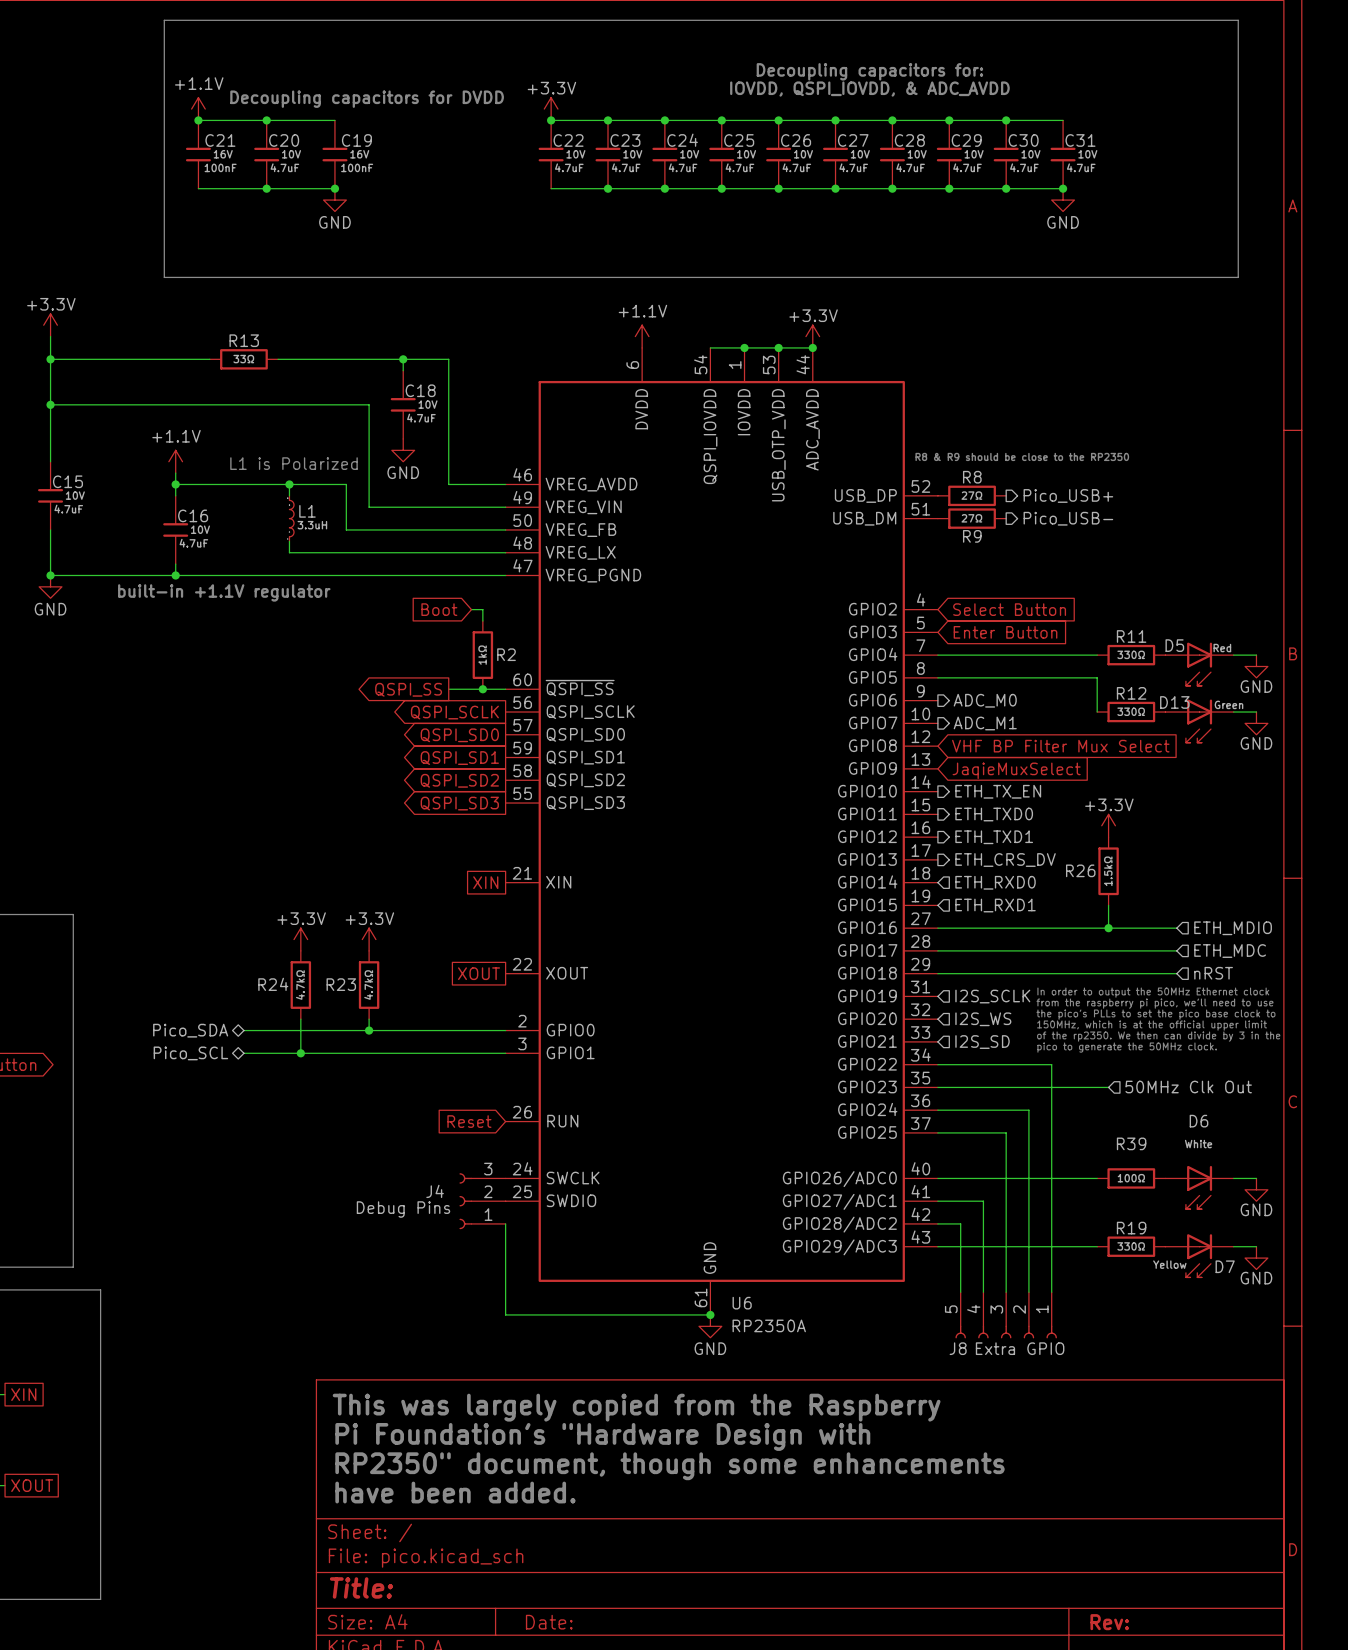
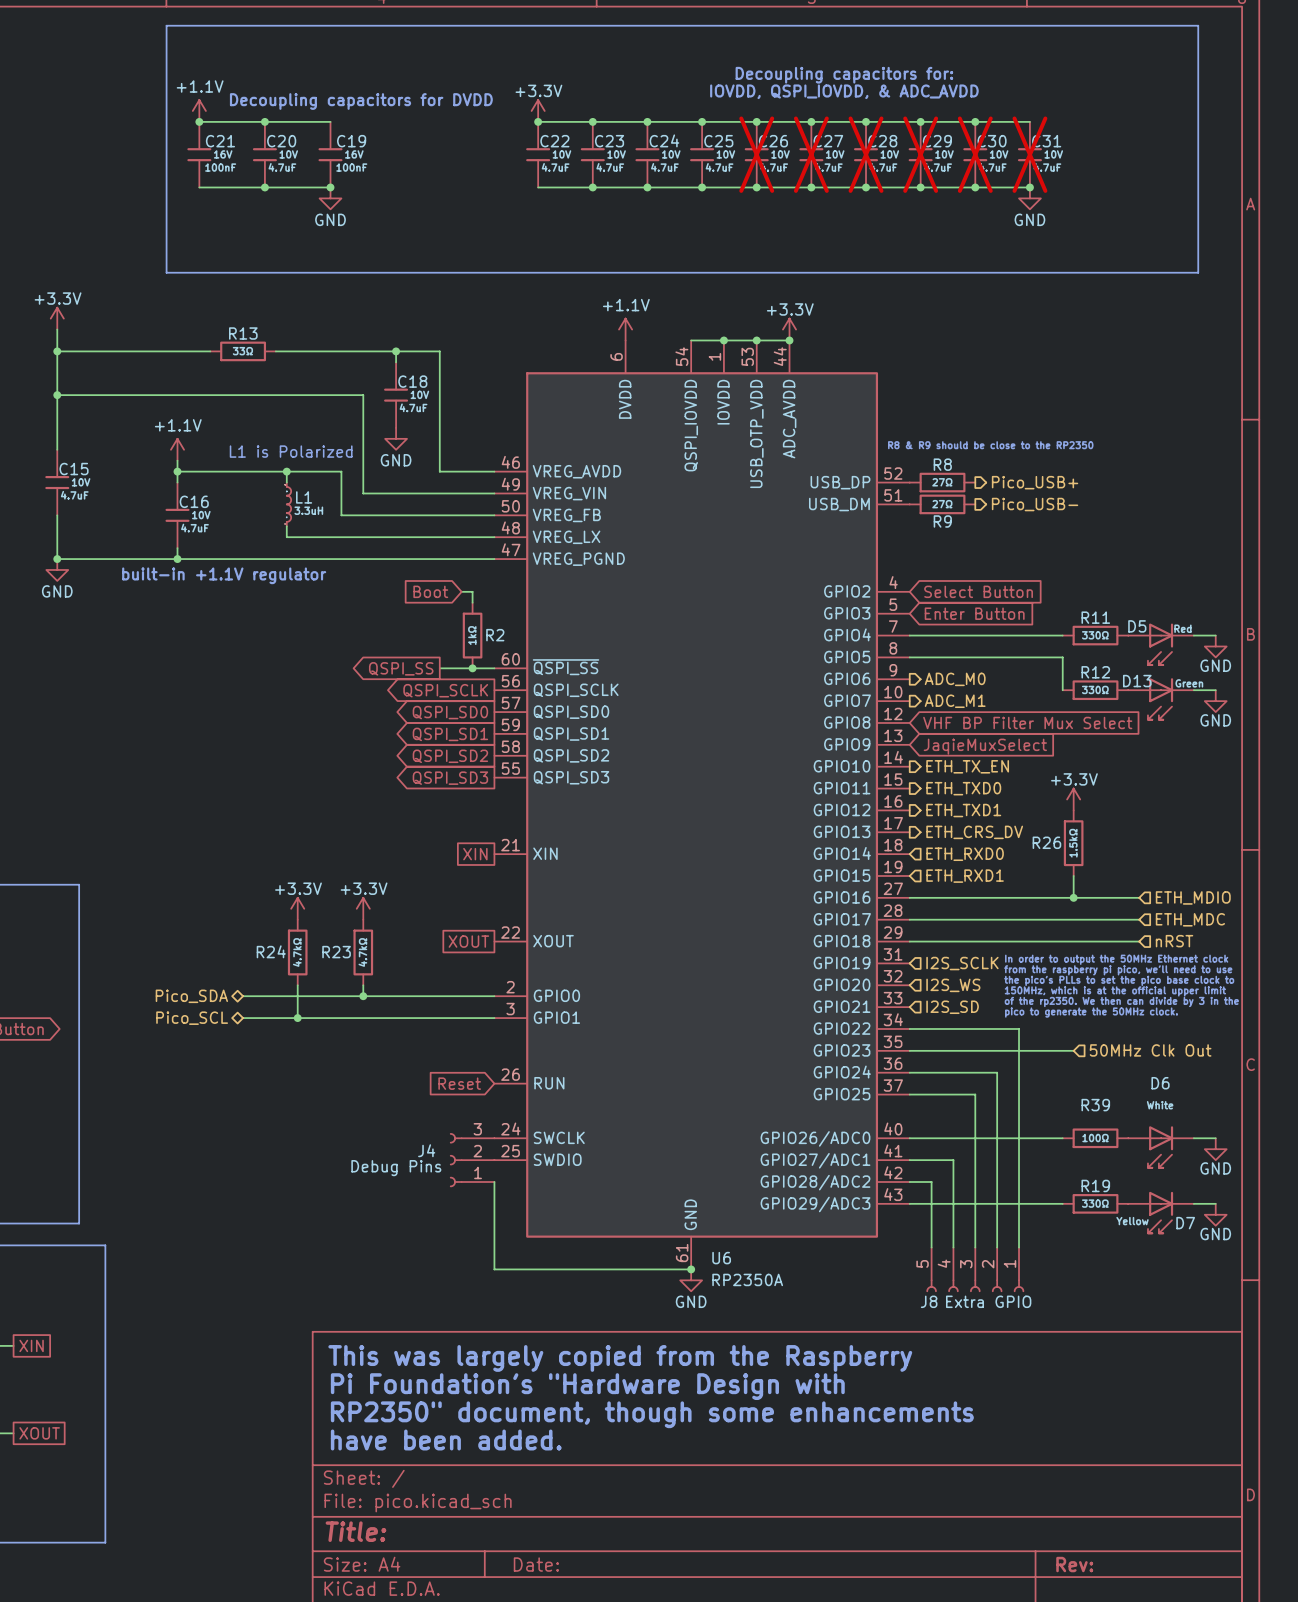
C26 do-not-place cross: none -> (756, 154)
C27 do-not-place cross: none -> (811, 154)
C28 do-not-place cross: none -> (866, 154)
C29 do-not-place cross: none -> (920, 154)
C30 do-not-place cross: none -> (975, 154)
C31 do-not-place cross: none -> (1029, 154)

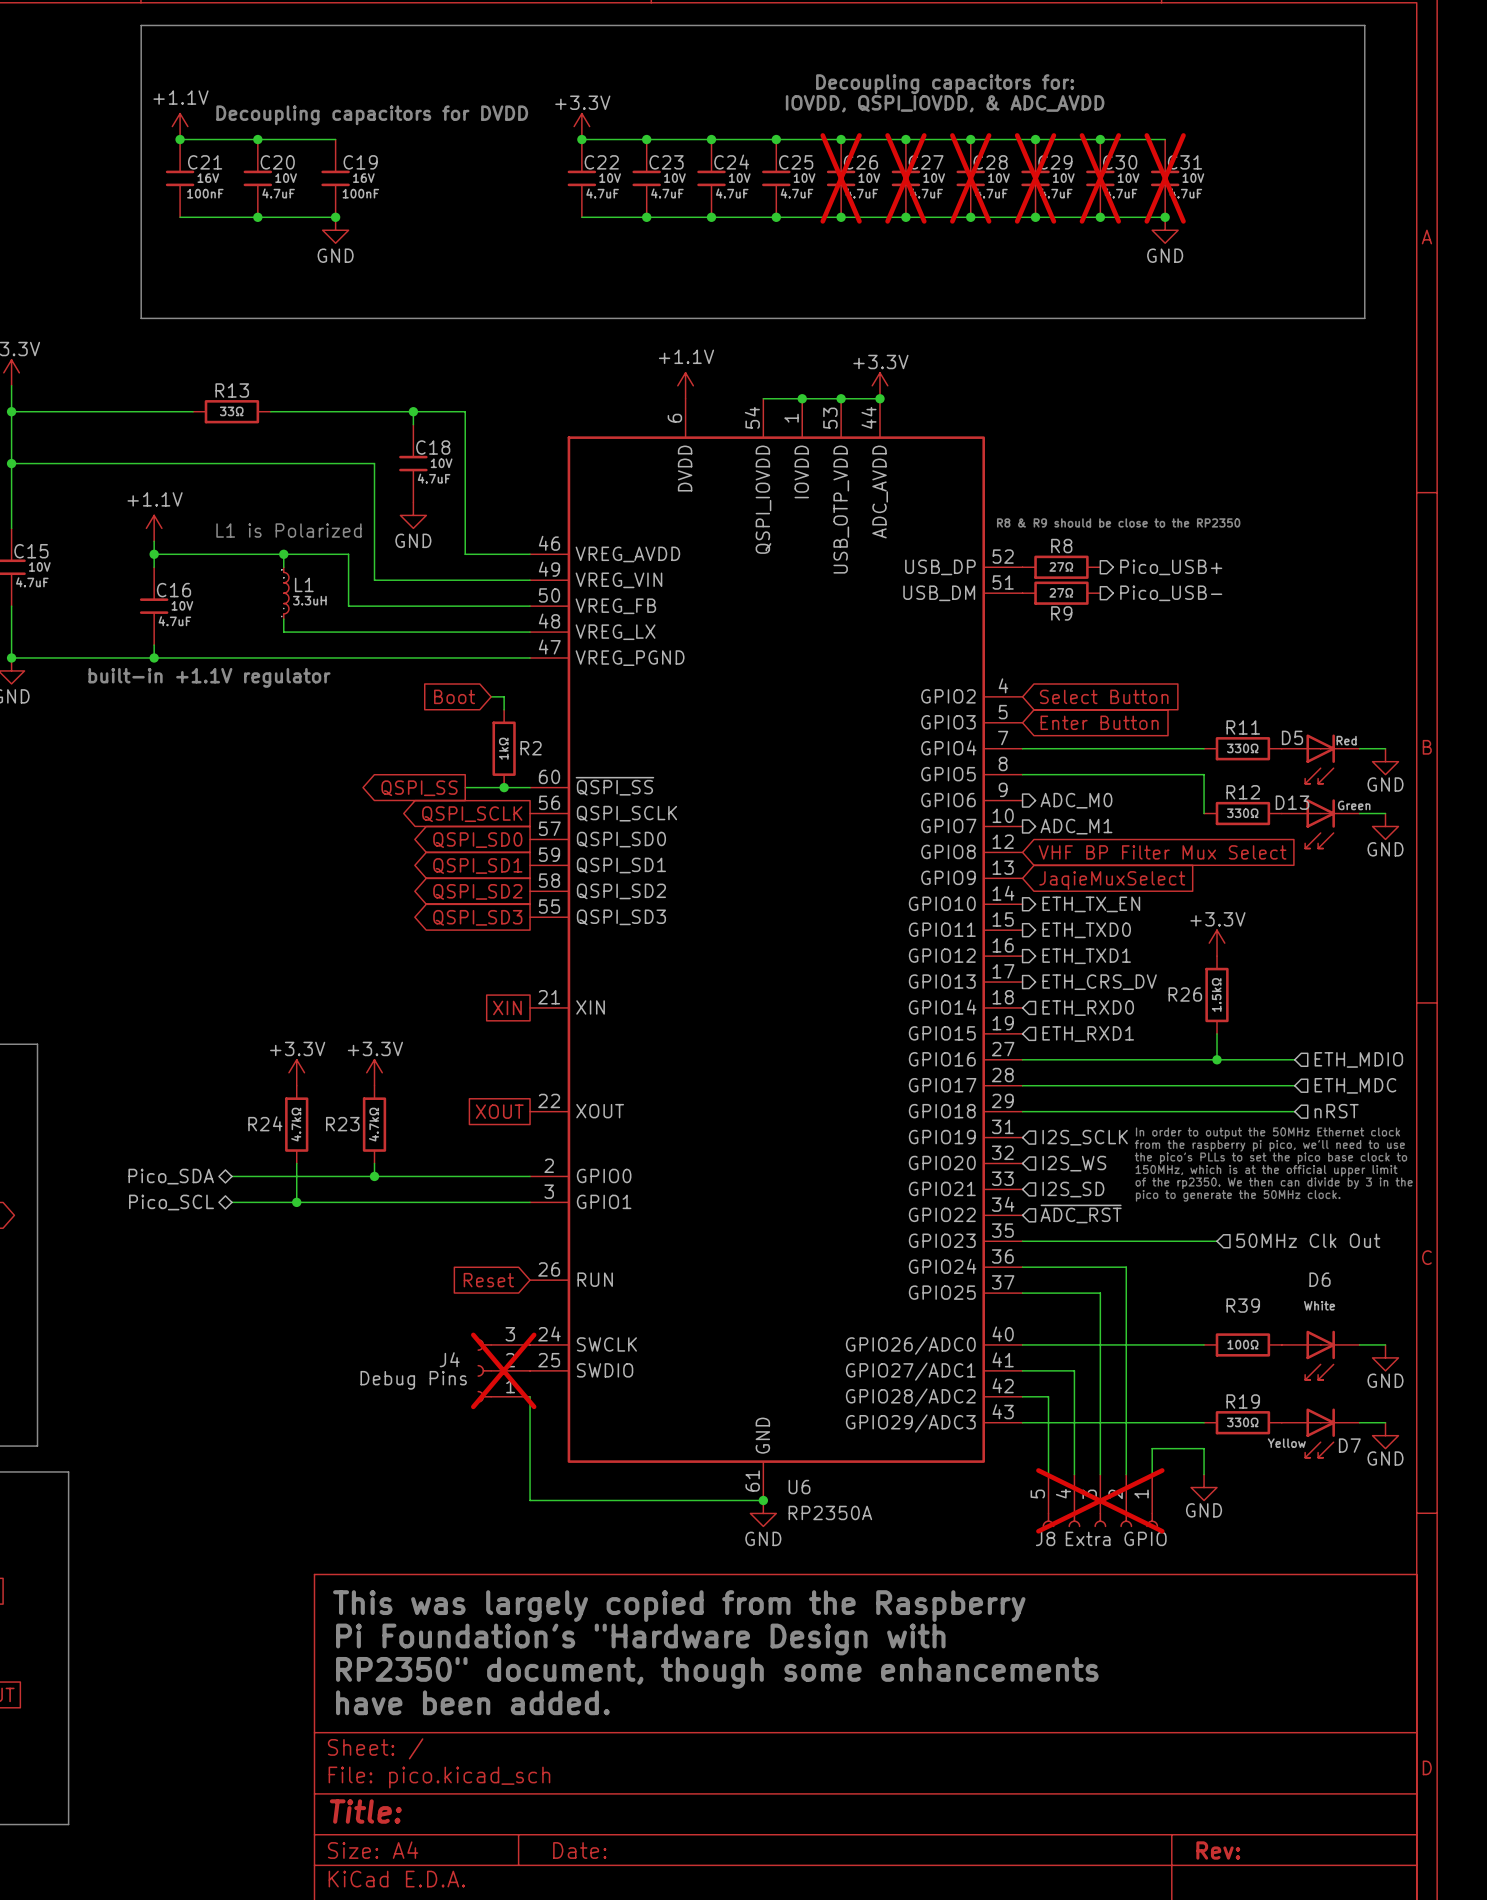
hierarchical label: none -> ~{ADC_RST} (1081, 1213)
wire: (909, 1028) (1019, 1028) (1019, 1225) -> (1204, 1474) (1204, 1448) (1152, 1448)
J4 do-not-place cross: none -> (503, 1370)
power symbol: none -> GND (1204, 1487)
J8 do-not-place cross: none -> (1100, 1500)

